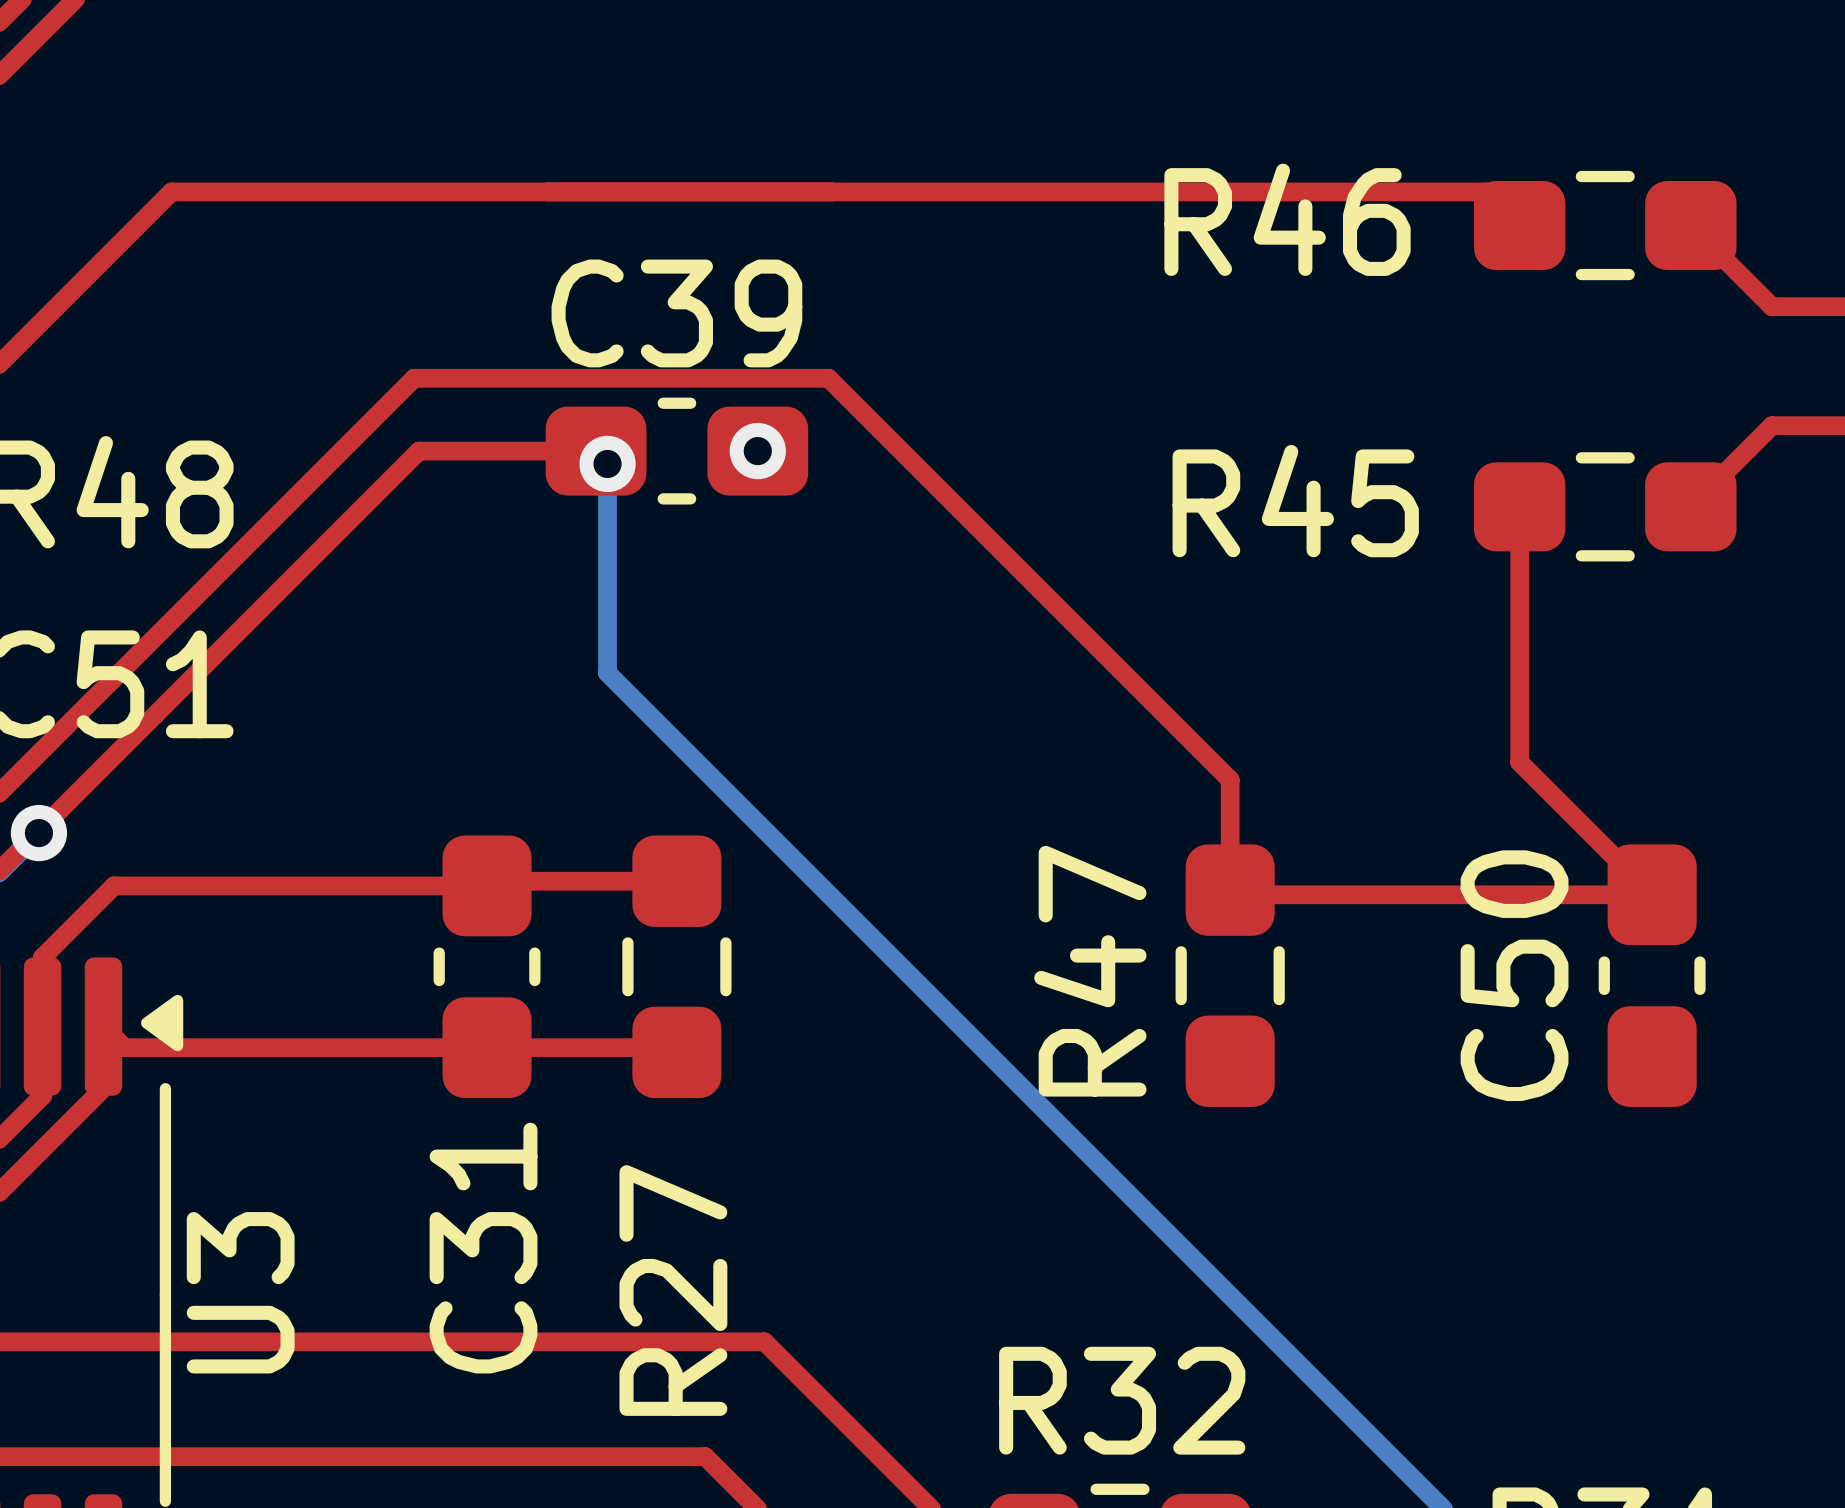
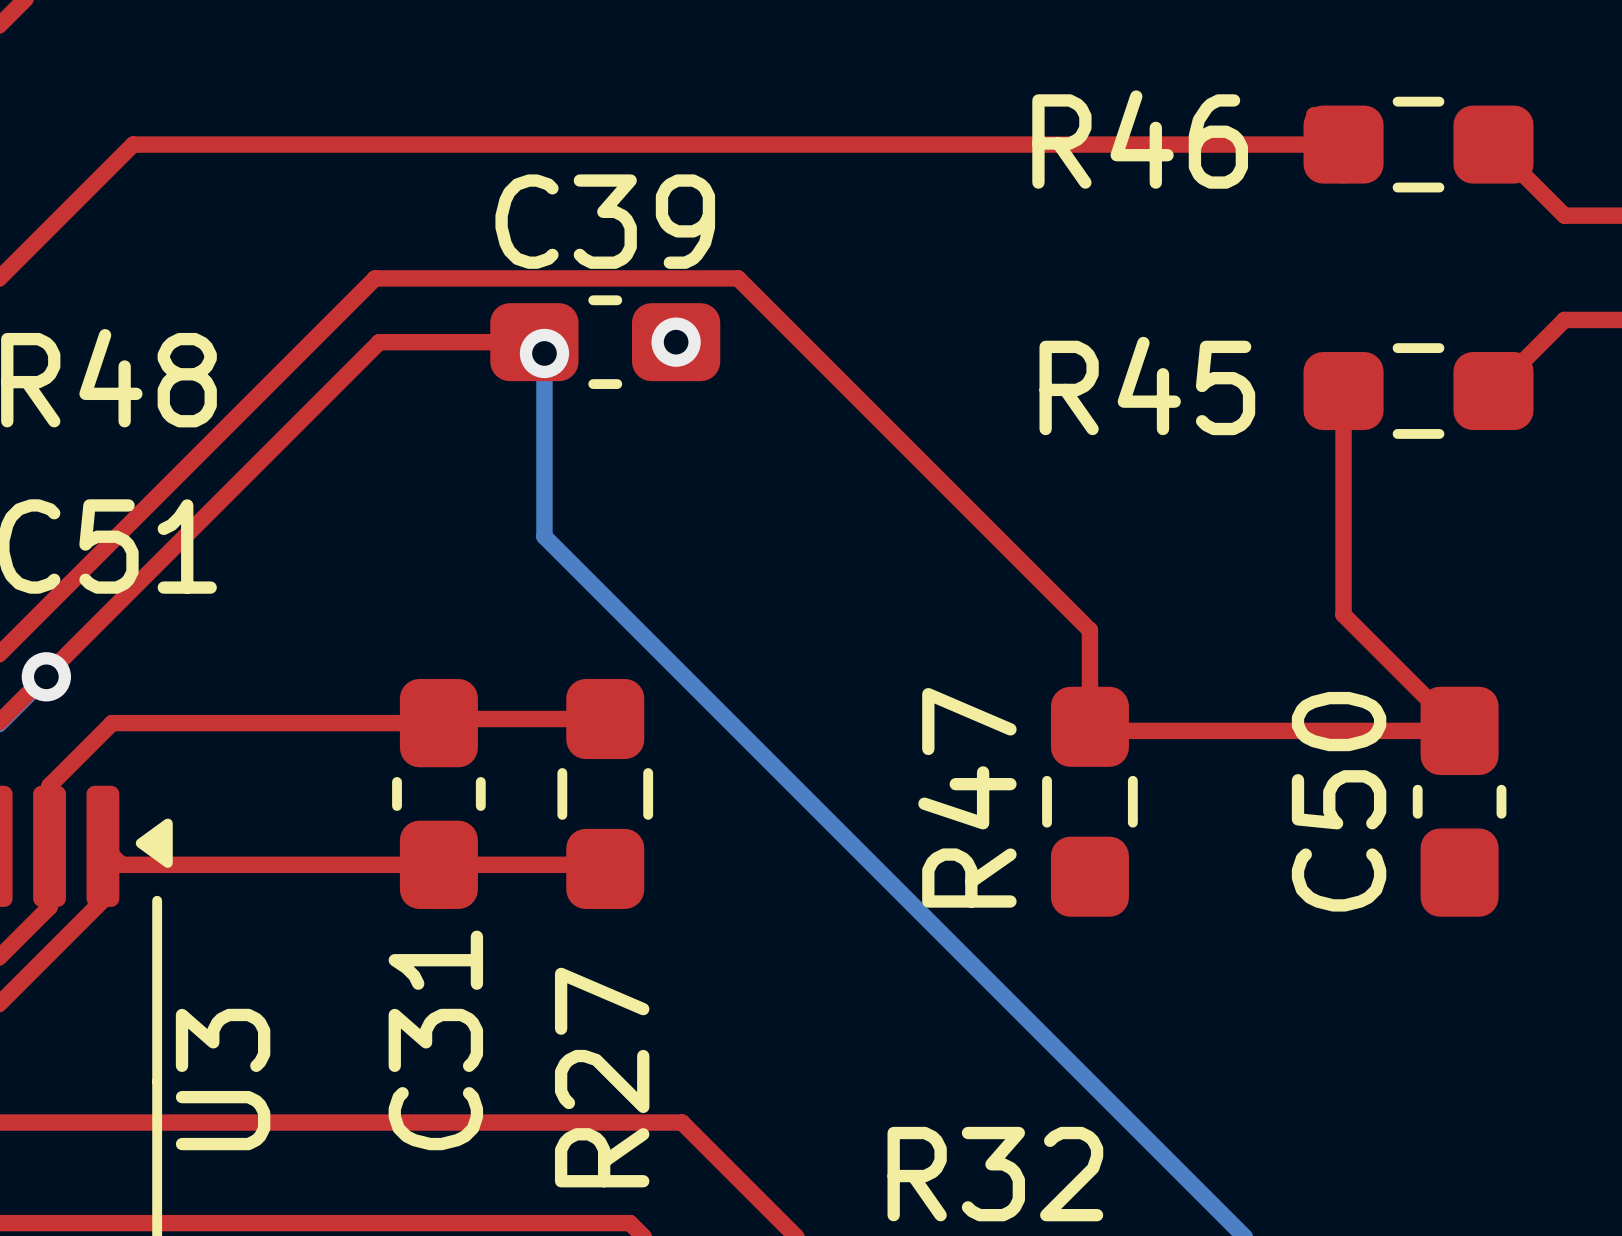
top track: (1486, 191) (171, 191) (138, 225) -> (1343, 144) (133, 144)

